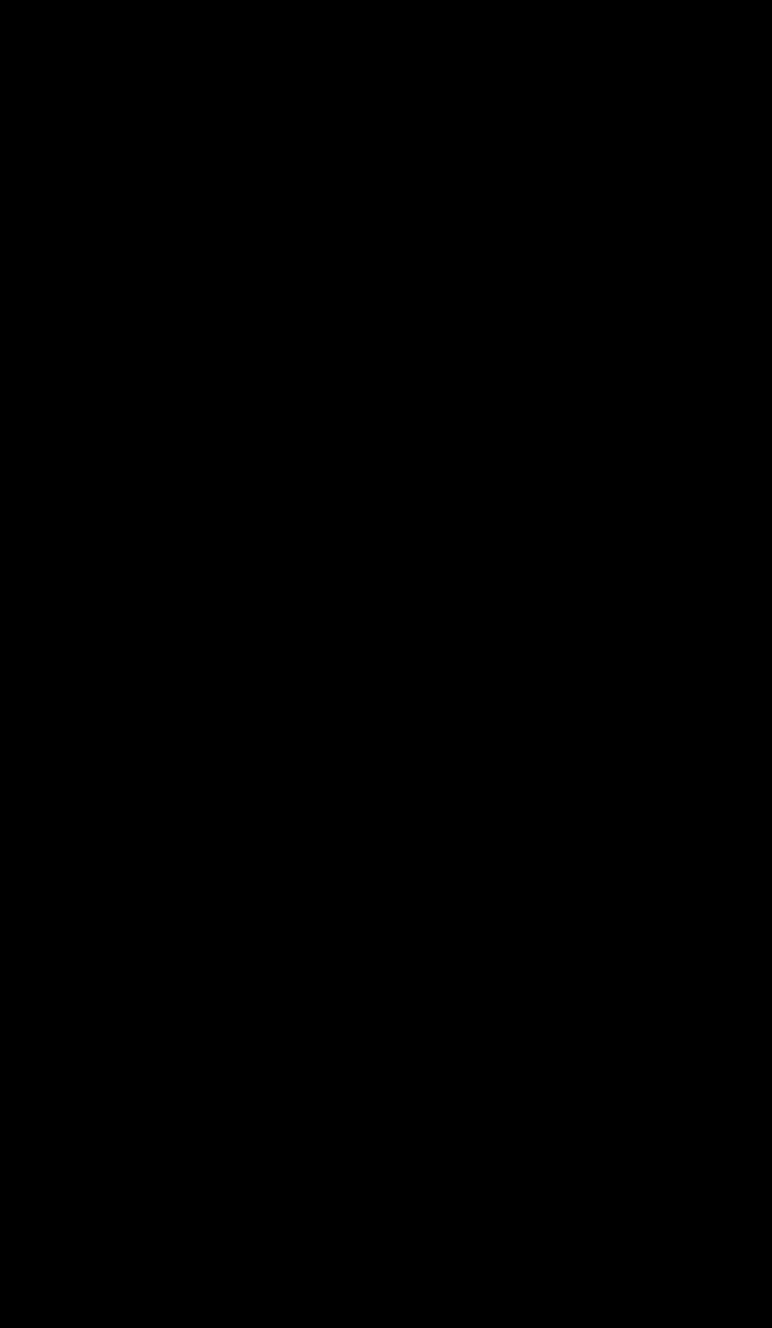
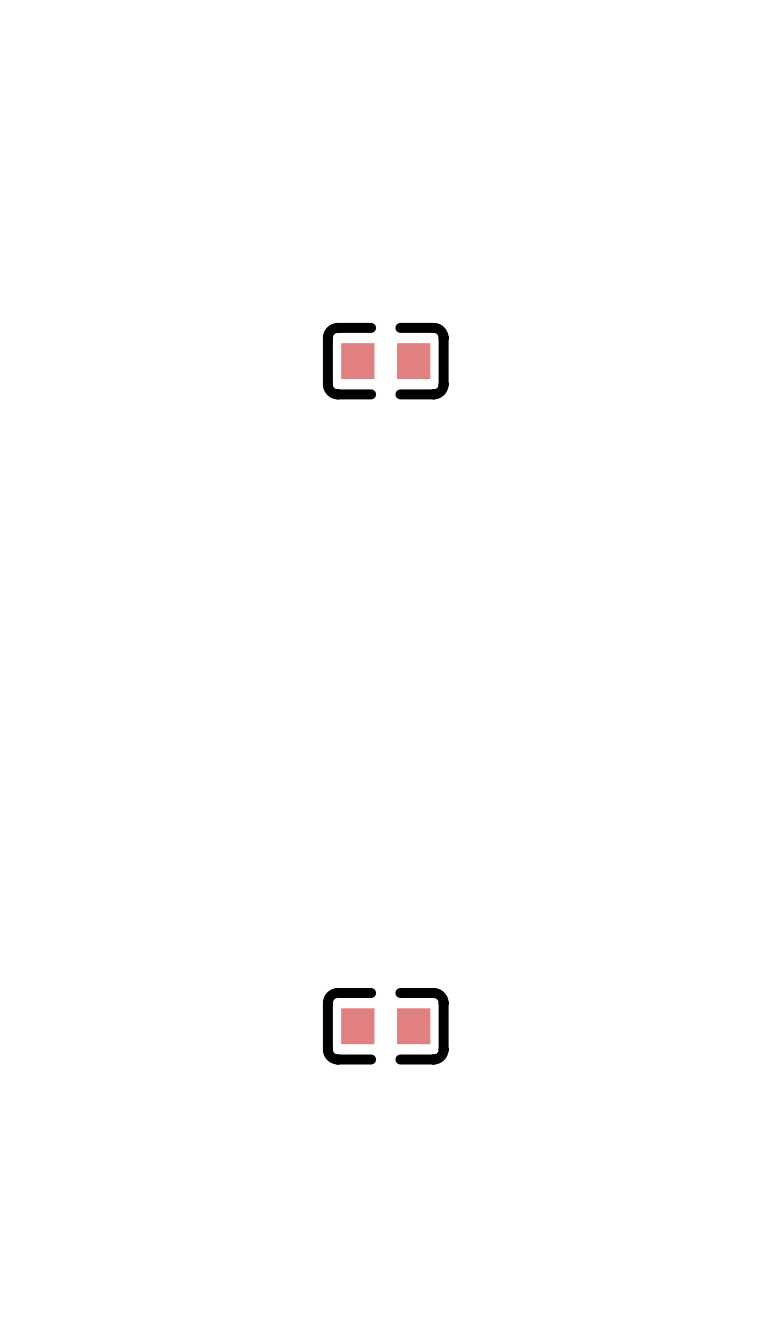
part: none -> (385, 361)
part: none -> (385, 1026)

